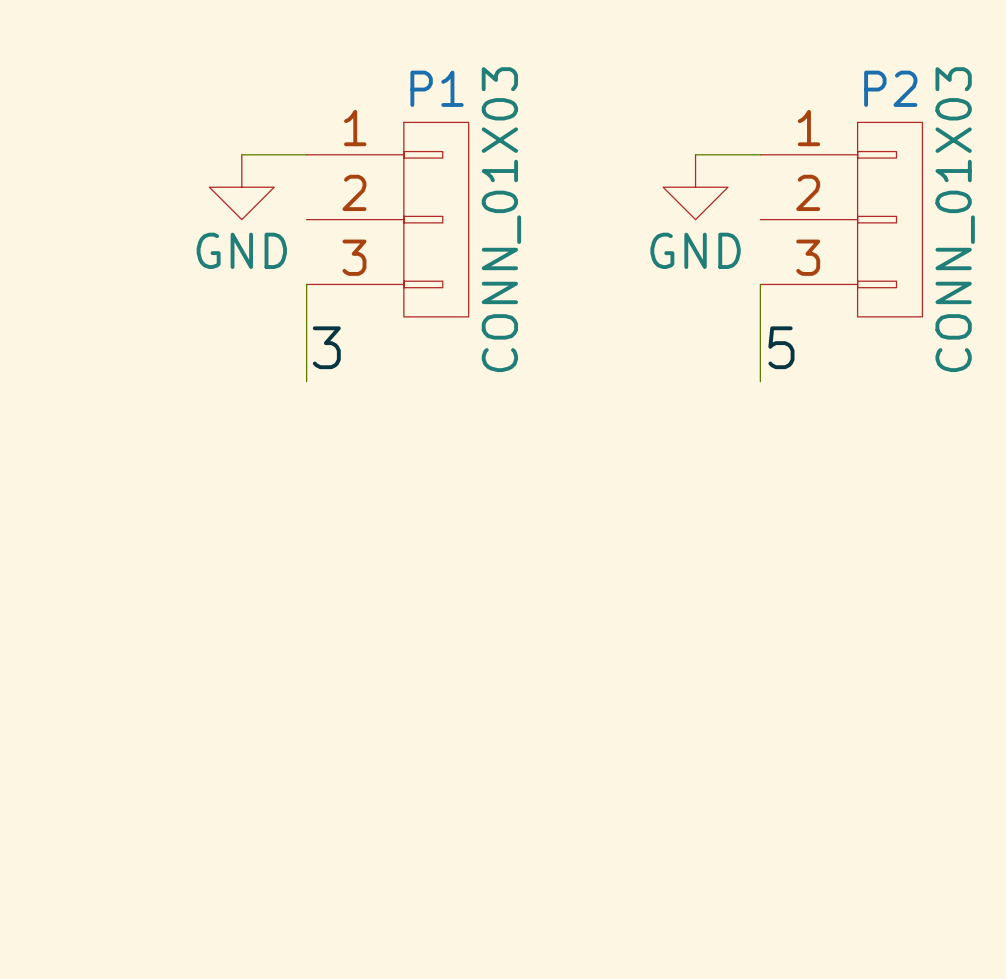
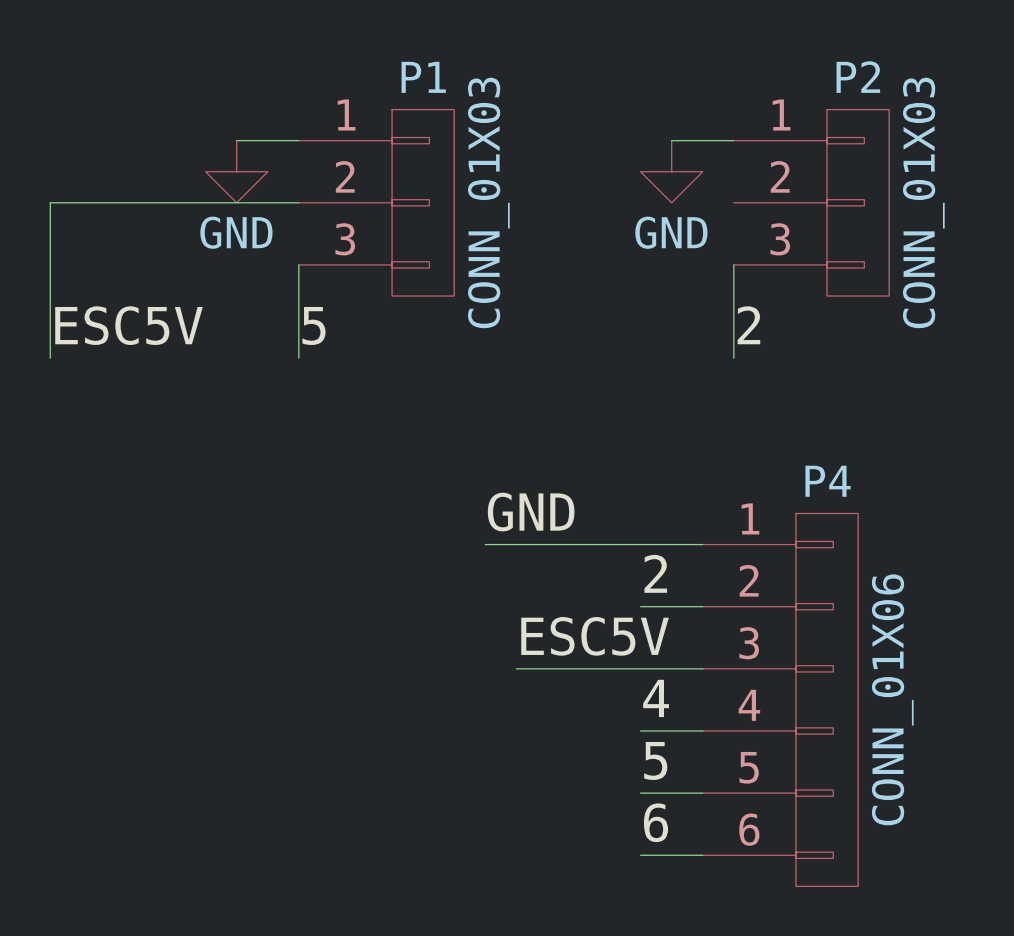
wire: none -> (298, 202) (50, 202) (50, 358)
label: none -> ESC5V (129, 325)
label: 3 (326, 347) -> 5 (313, 325)
label: 5 (781, 347) -> 2 (748, 325)
label: none -> GND (531, 512)
wire: none -> (485, 544) (702, 544)
label: none -> 2 (655, 573)
wire: none -> (640, 606) (702, 606)
label: none -> ESC5V (595, 636)
wire: none -> (516, 668) (702, 668)
label: none -> 4 (656, 698)
P4: none -> CONN_01X06 (780, 699)
wire: none -> (640, 730) (702, 730)
label: none -> 5 (655, 760)
wire: none -> (640, 793) (702, 793)
label: none -> 6 (656, 822)
wire: none -> (640, 855) (702, 855)

